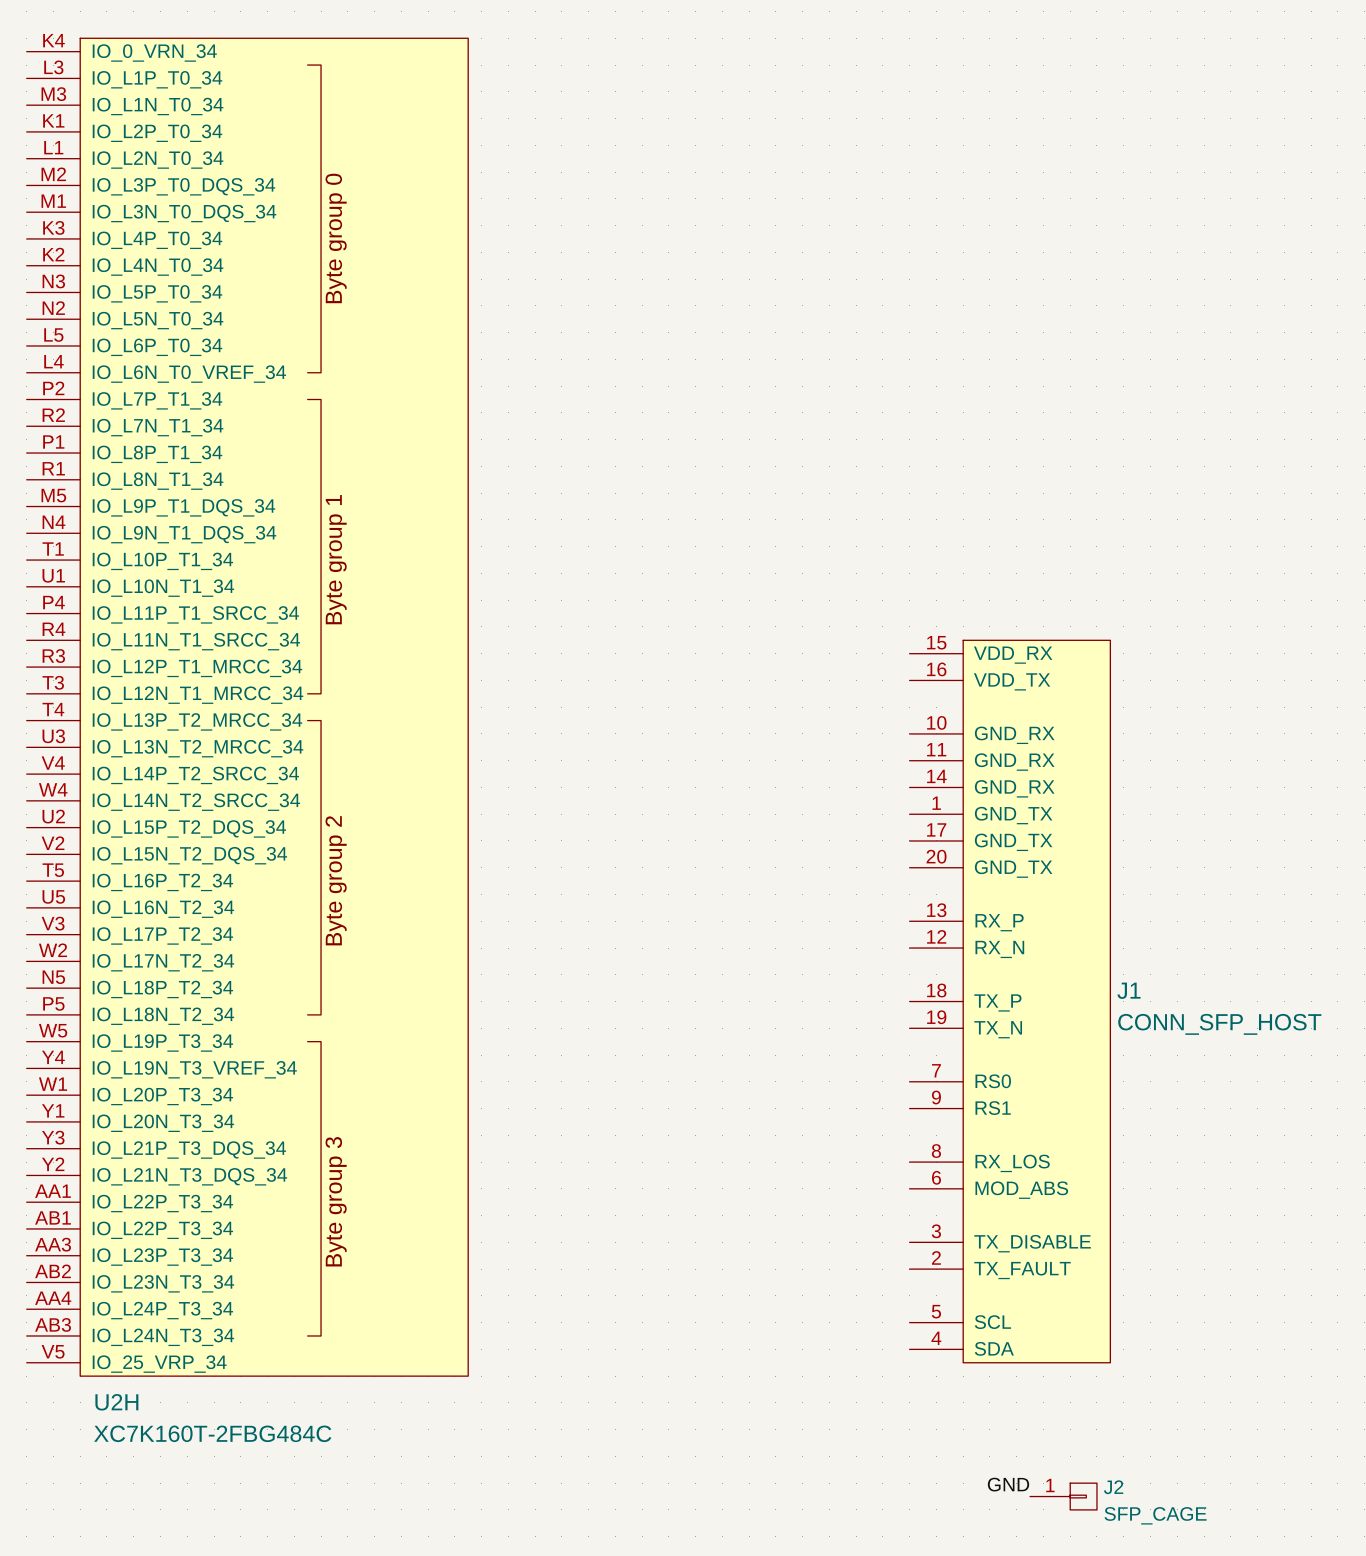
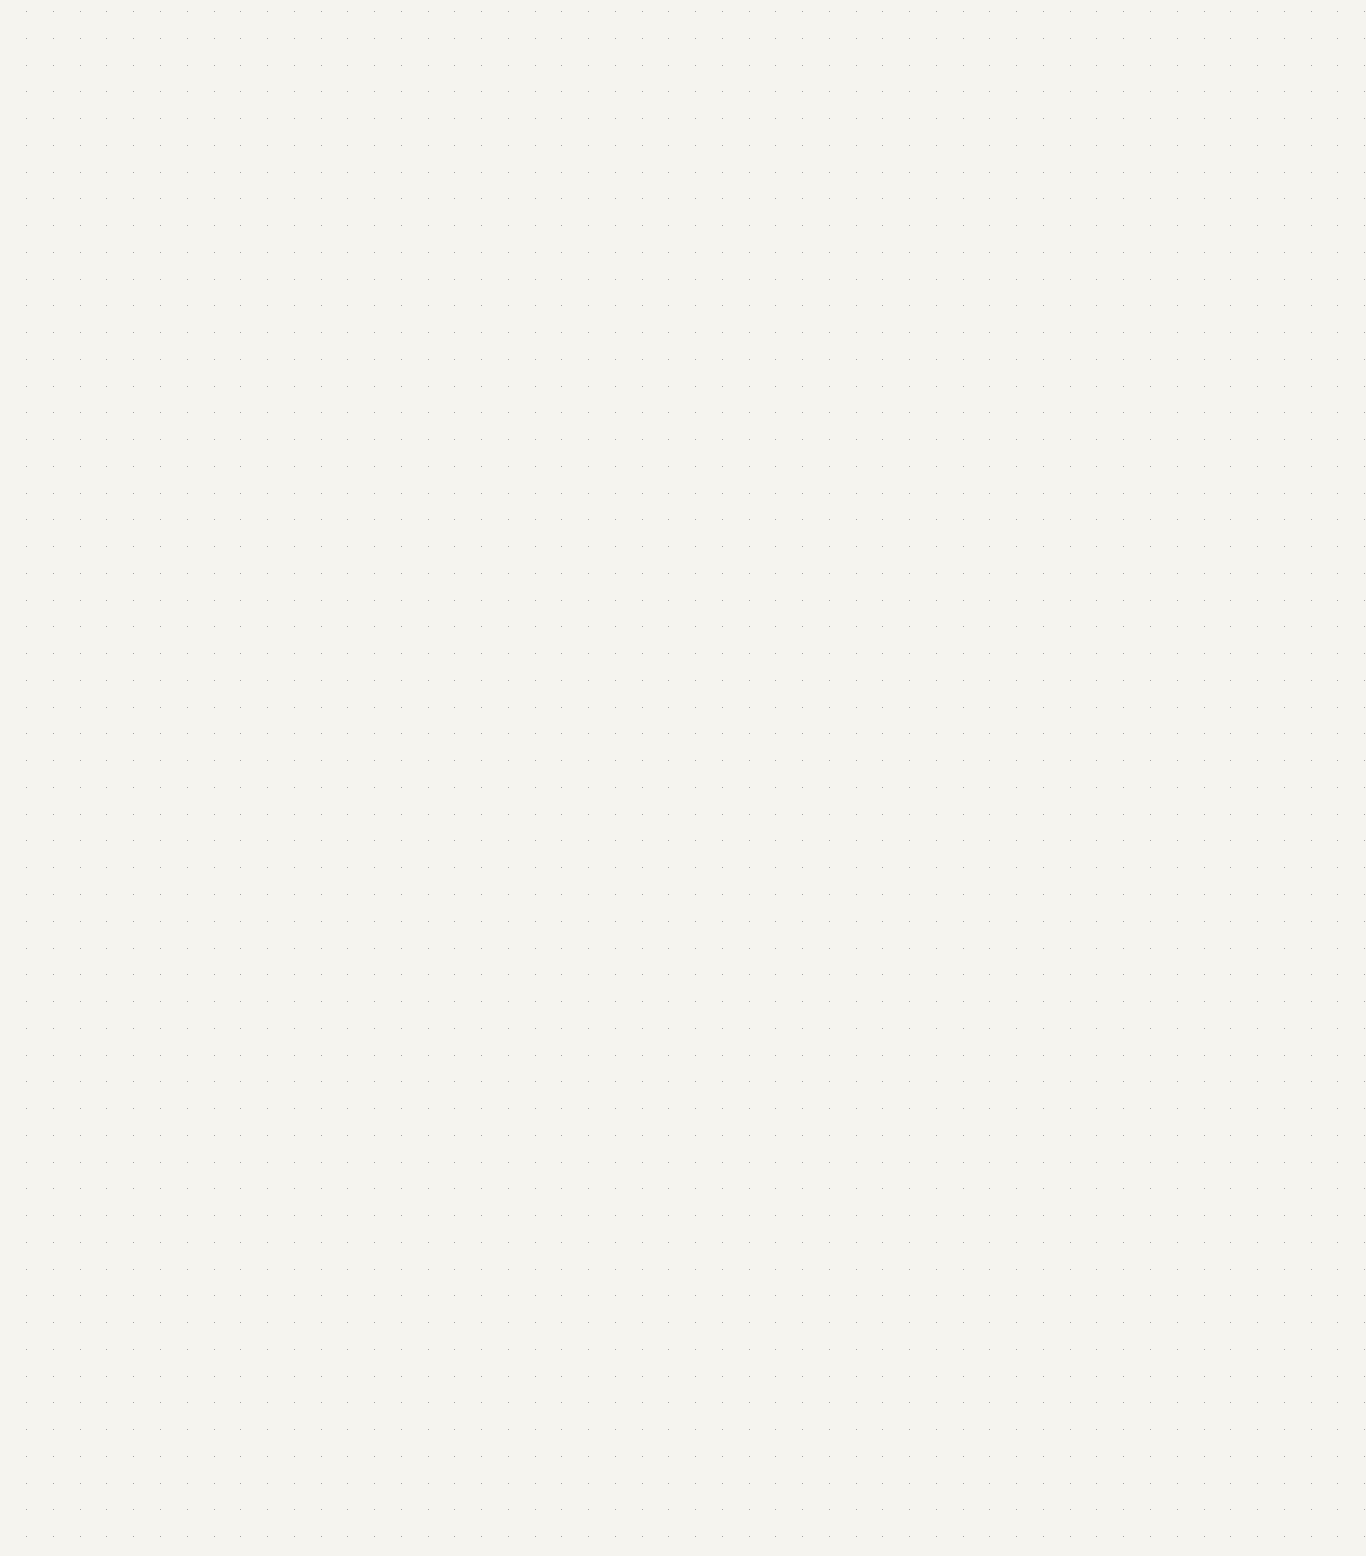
U2H: XC7K160T-2FBG484C (247, 707) -> none
J1: CONN_SFP_HOST (1010, 1001) -> none
label: GND (1008, 1484) -> none
J2: SFP_CAGE (1063, 1496) -> none

